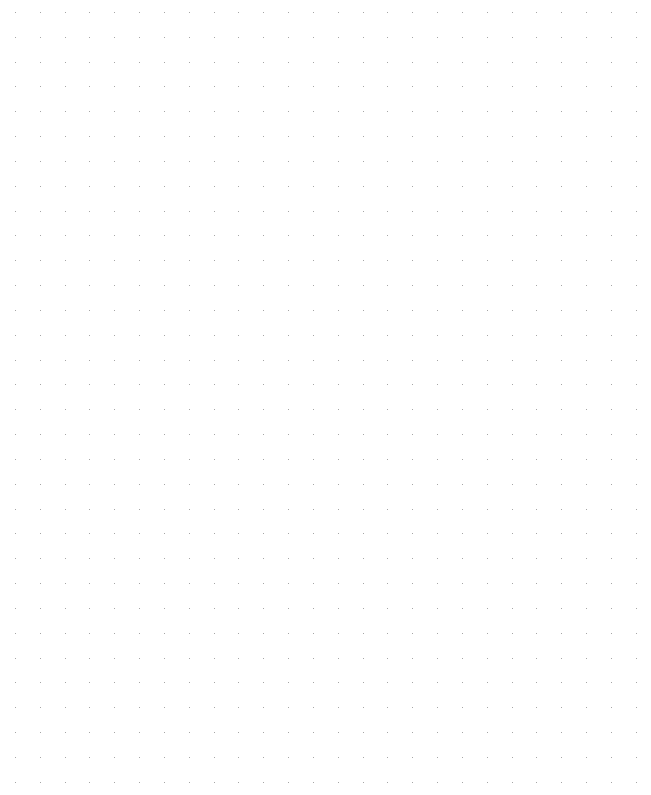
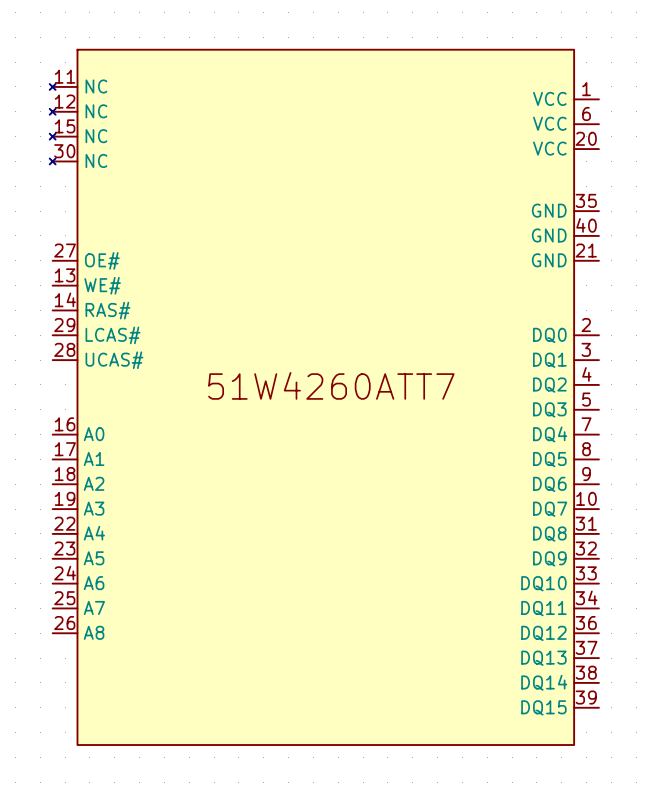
part: none -> (324, 397)

